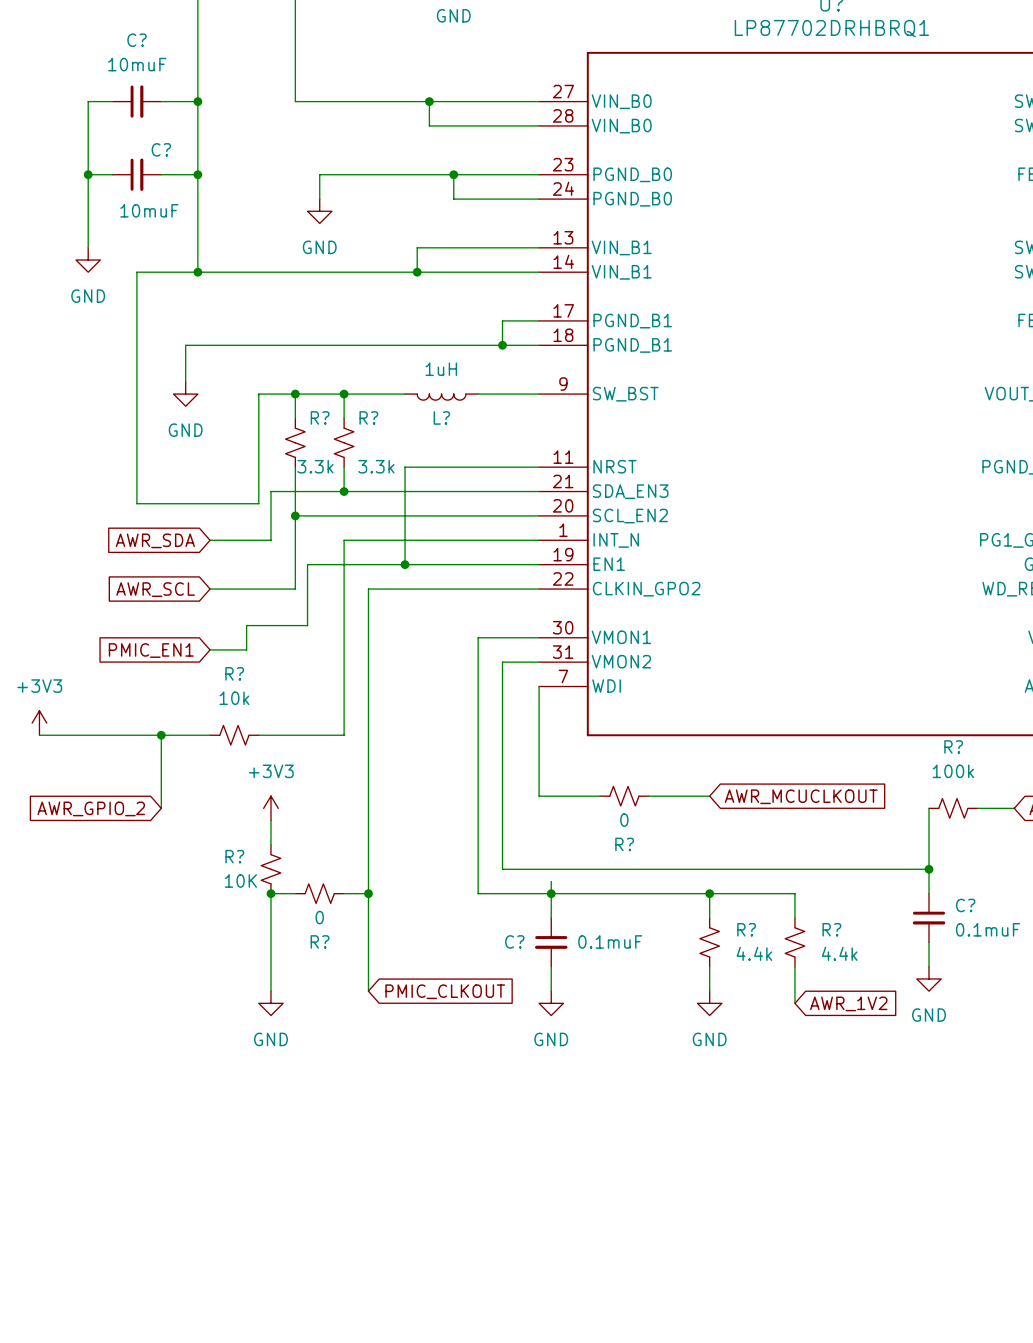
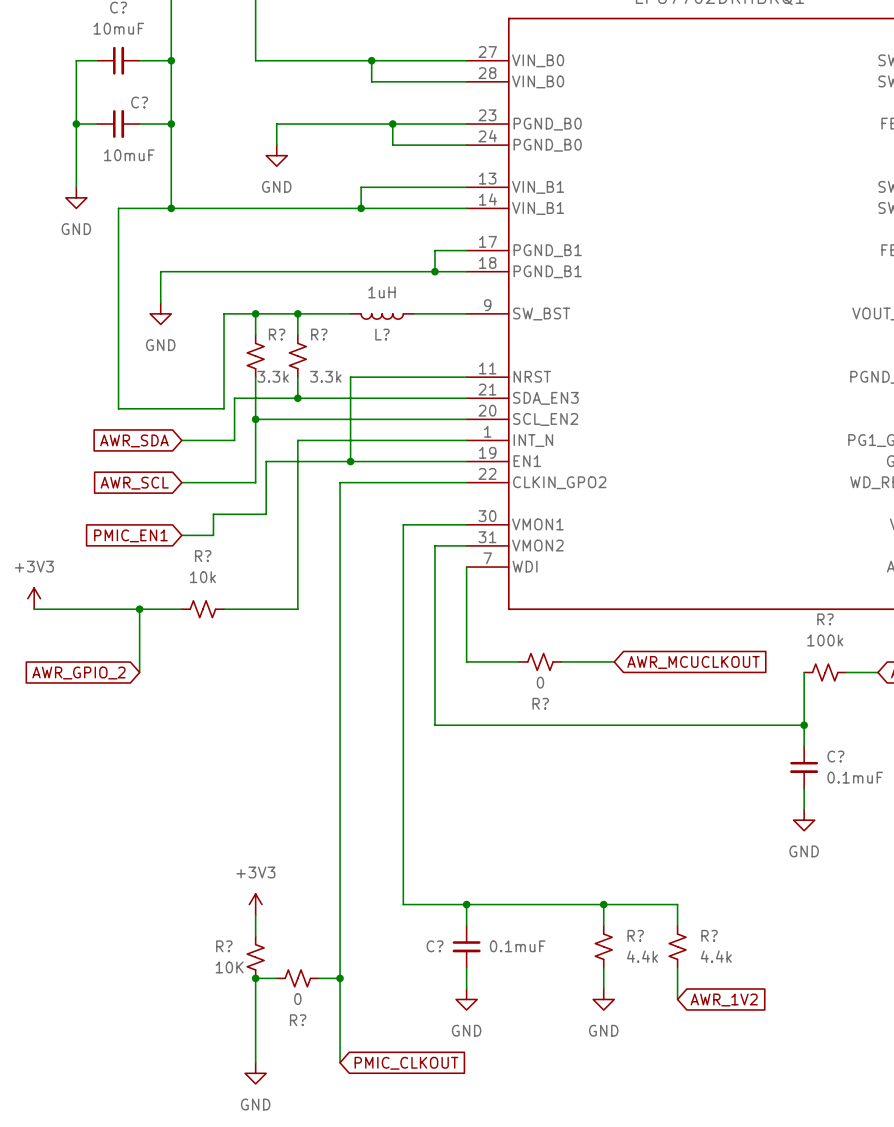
wire: (392, 589) (368, 589) (368, 991) -> (340, 482) (340, 1062)
wire: (478, 637) (478, 893) (794, 893) (794, 918) -> (413, 524) (403, 524) (403, 904) (677, 904) (677, 925)
power symbol: +3V3 (270, 808) -> none
wire: (270, 820) (270, 844) -> none
R?: 10K (270, 869) -> none
wire: (551, 881) (551, 918) -> none
junction: (270, 893) -> none
wire: (295, 893) (270, 893) (270, 991) -> none
R?: 0 (319, 893) -> none
wire: (344, 893) (368, 893) -> none
junction: (368, 893) -> none
junction: (551, 893) -> none
wire: (709, 893) (709, 918) -> (603, 904) (603, 925)
junction: (709, 893) -> none
C? position: (551, 942) -> (466, 946)
R?: 4.4k (709, 942) -> none
R?: 4.4k (794, 942) -> none
wire: (551, 966) (551, 991) -> (466, 967) (466, 988)
wire: (709, 966) (709, 991) -> (603, 967) (603, 988)
wire: (794, 966) (794, 1003) -> (677, 967) (677, 999)
global label: PMIC_CLKOUT (445, 991) -> none
power symbol: GND (270, 1003) -> none
power symbol: GND (551, 1003) -> none
power symbol: GND (709, 1003) -> none
global label position: AWR_1V2 (848, 1003) -> AWR_1V2 (724, 999)
power symbol: none -> +3V3 (255, 904)
wire: none -> (466, 904) (466, 925)
junction: none -> (466, 904)
junction: none -> (603, 904)
wire: none -> (255, 915) (255, 936)
R?: none -> 4.4k (603, 946)
R?: none -> 4.4k (677, 946)
R?: none -> 10K (255, 957)
junction: none -> (255, 978)
wire: none -> (276, 978) (255, 978) (255, 1062)
R?: none -> 0 (297, 978)
wire: none -> (318, 978) (340, 978)
junction: none -> (340, 978)
power symbol: none -> GND (466, 999)
power symbol: none -> GND (603, 999)
global label: none -> PMIC_CLKOUT (406, 1063)
power symbol: none -> GND (255, 1073)

